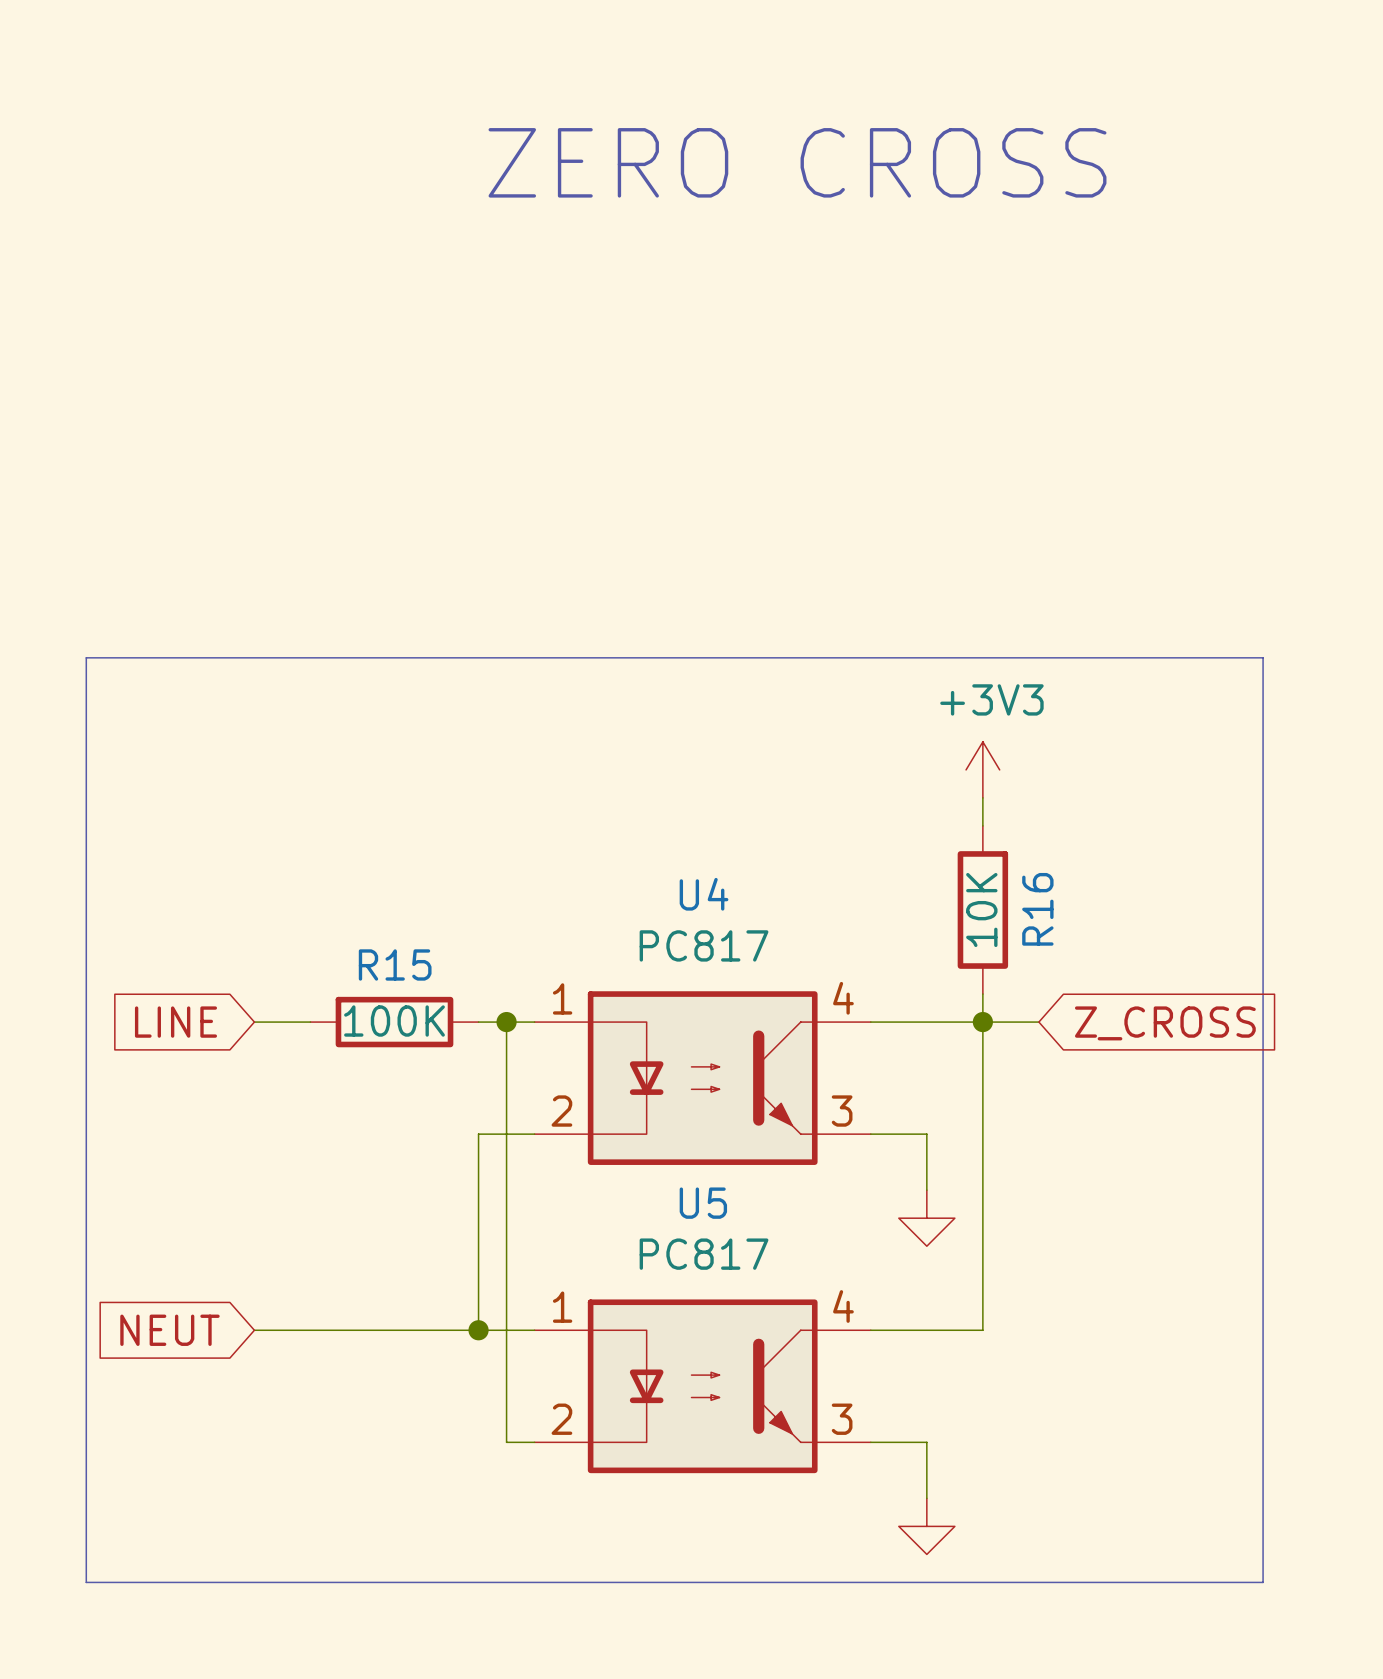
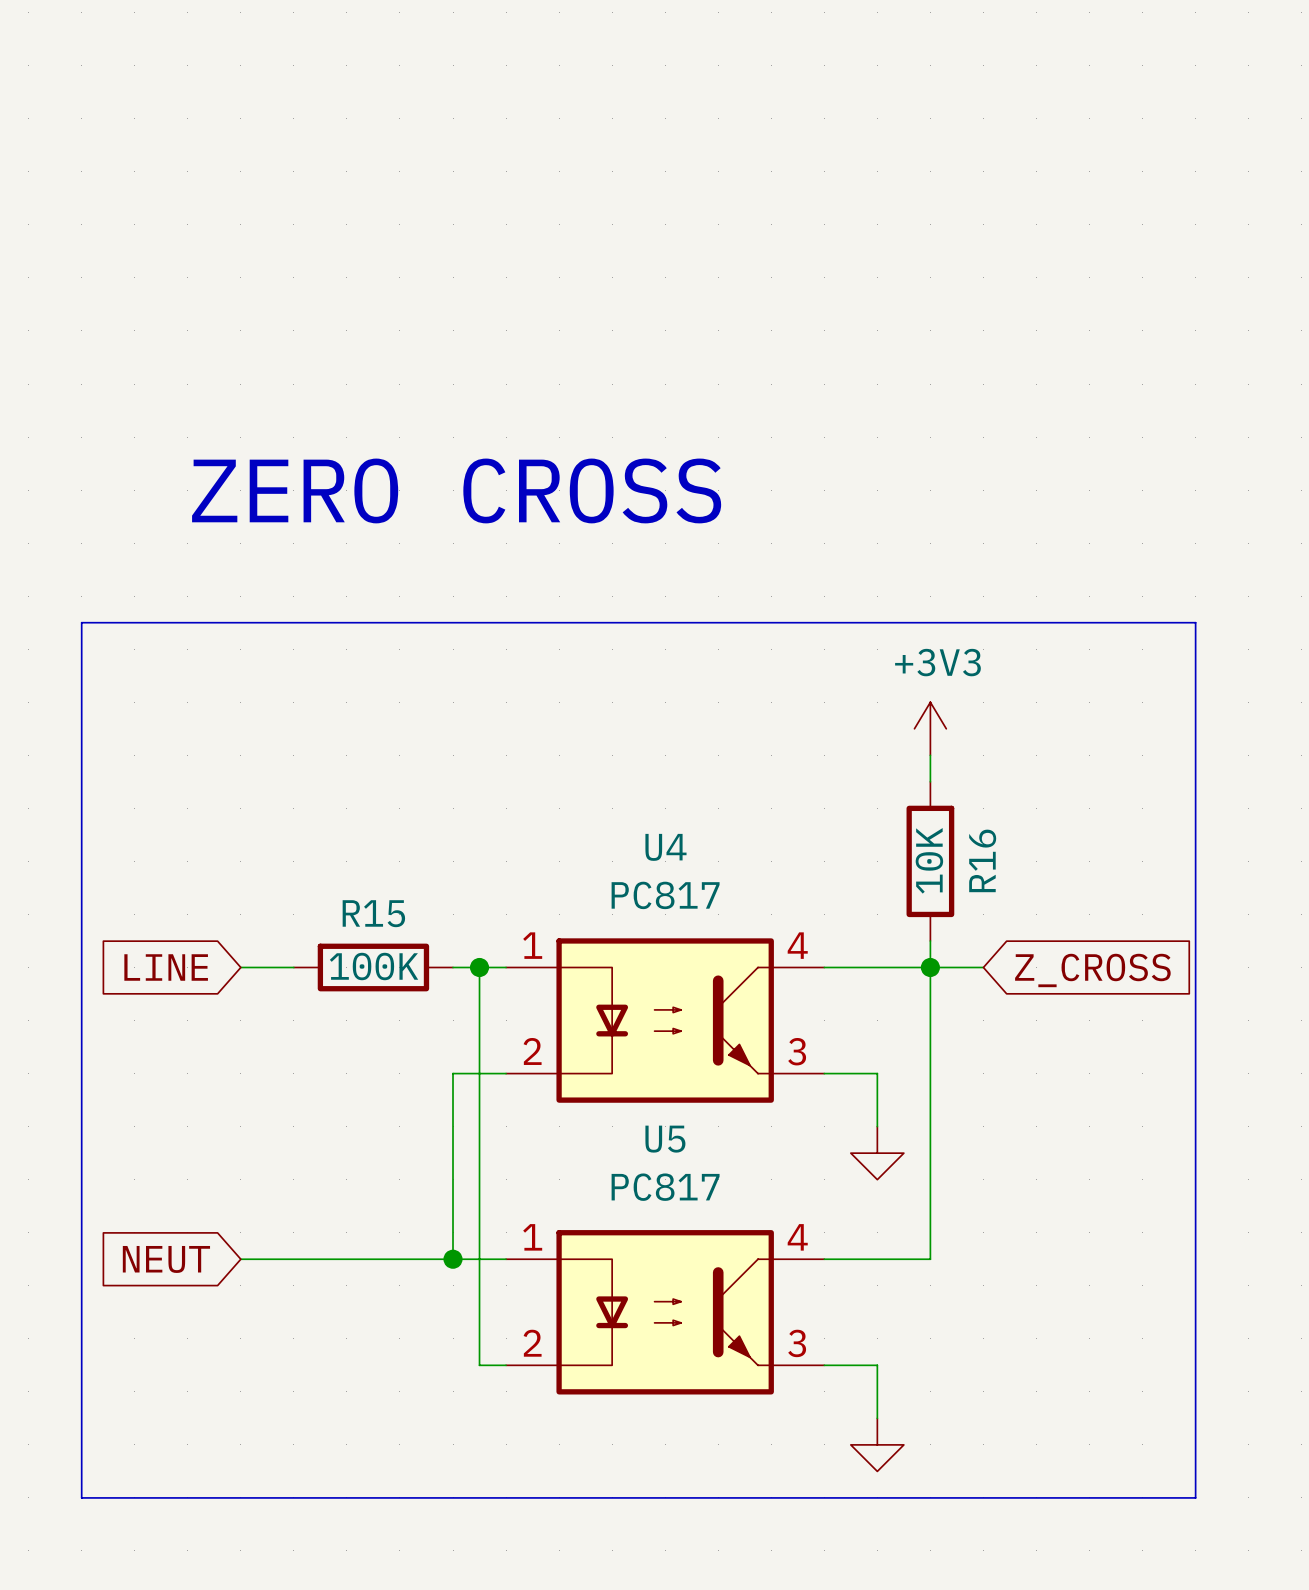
text position: ZERO CROSS (797, 162) -> ZERO CROSS (456, 490)

